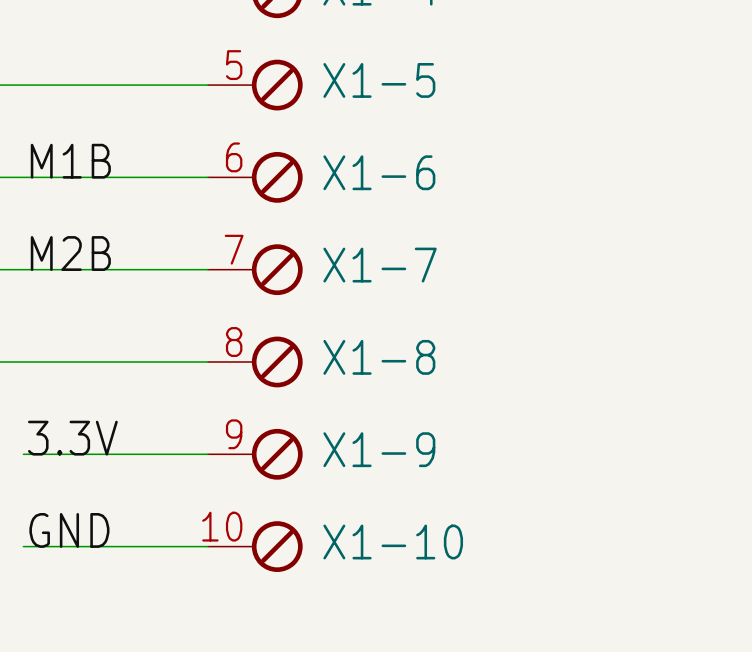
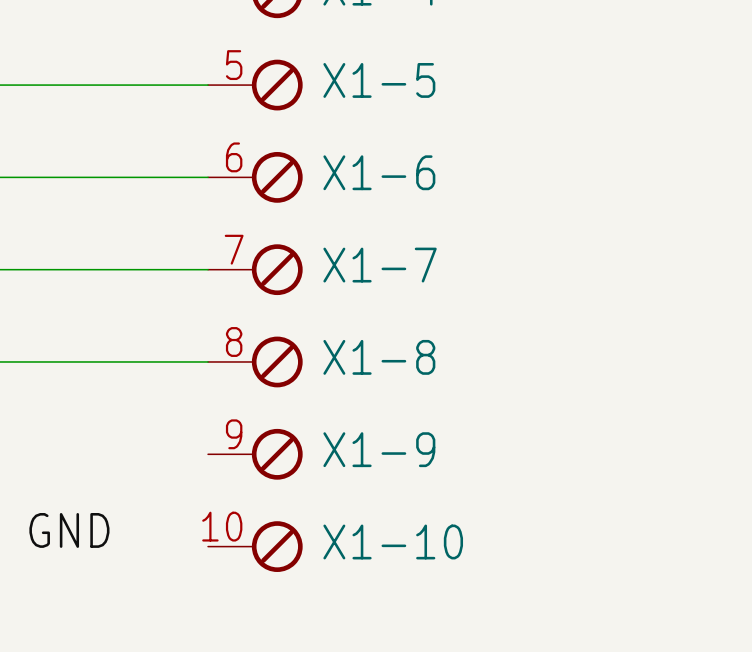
label: M1B (70, 161) -> none
label: M2B (70, 253) -> none
label: 3.3V (72, 438) -> none
wire: (23, 454) (208, 454) -> none
wire: (23, 546) (208, 546) -> none

